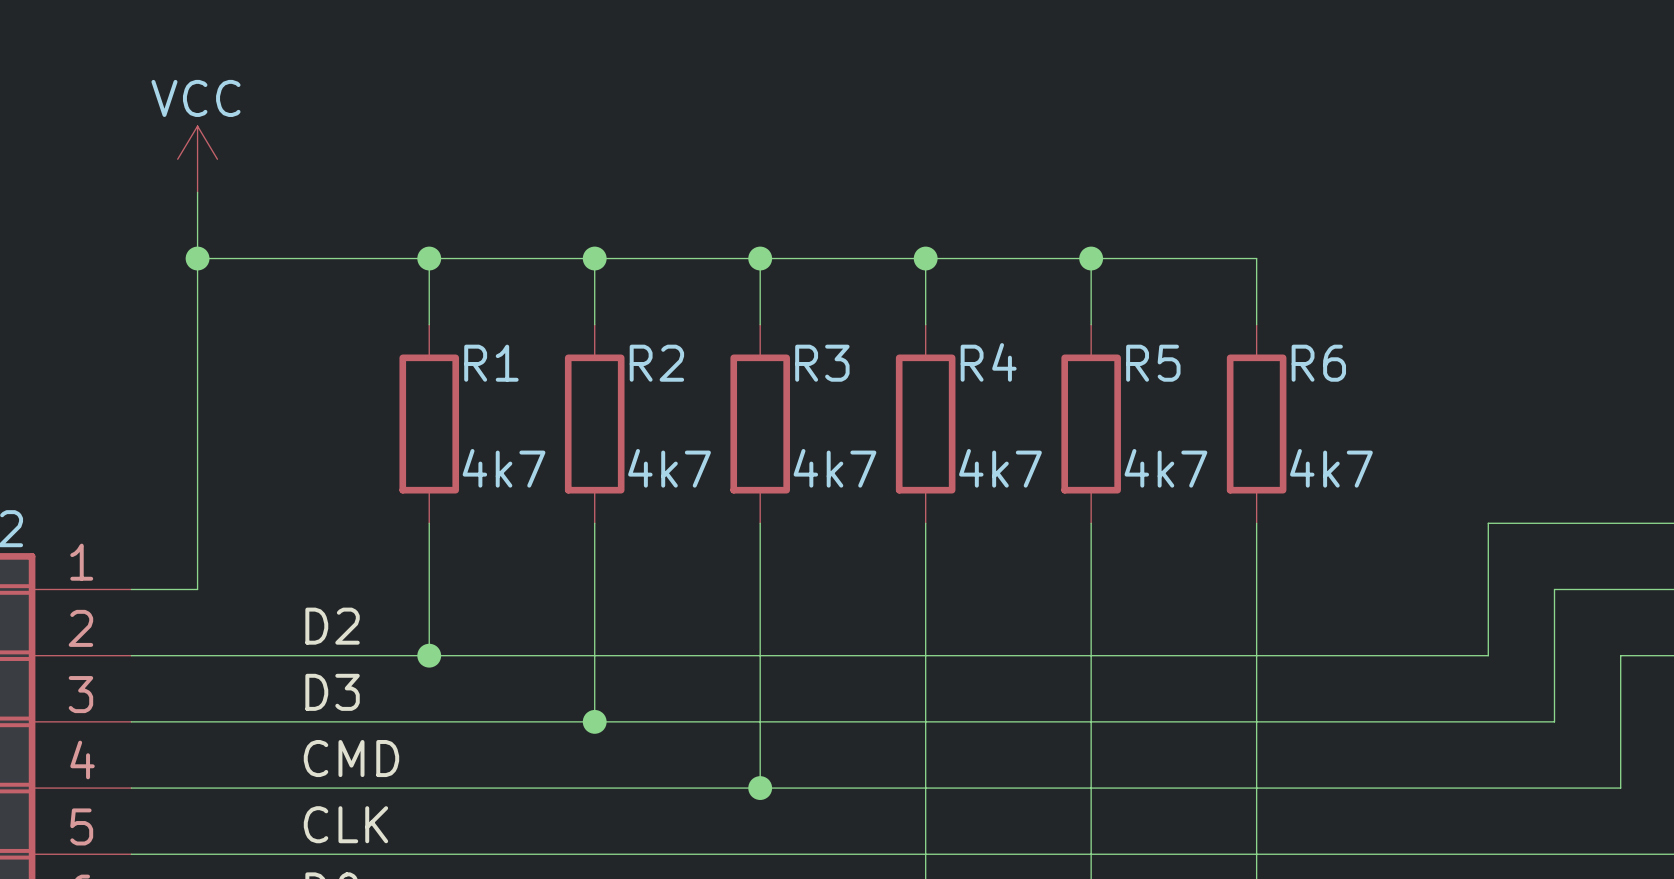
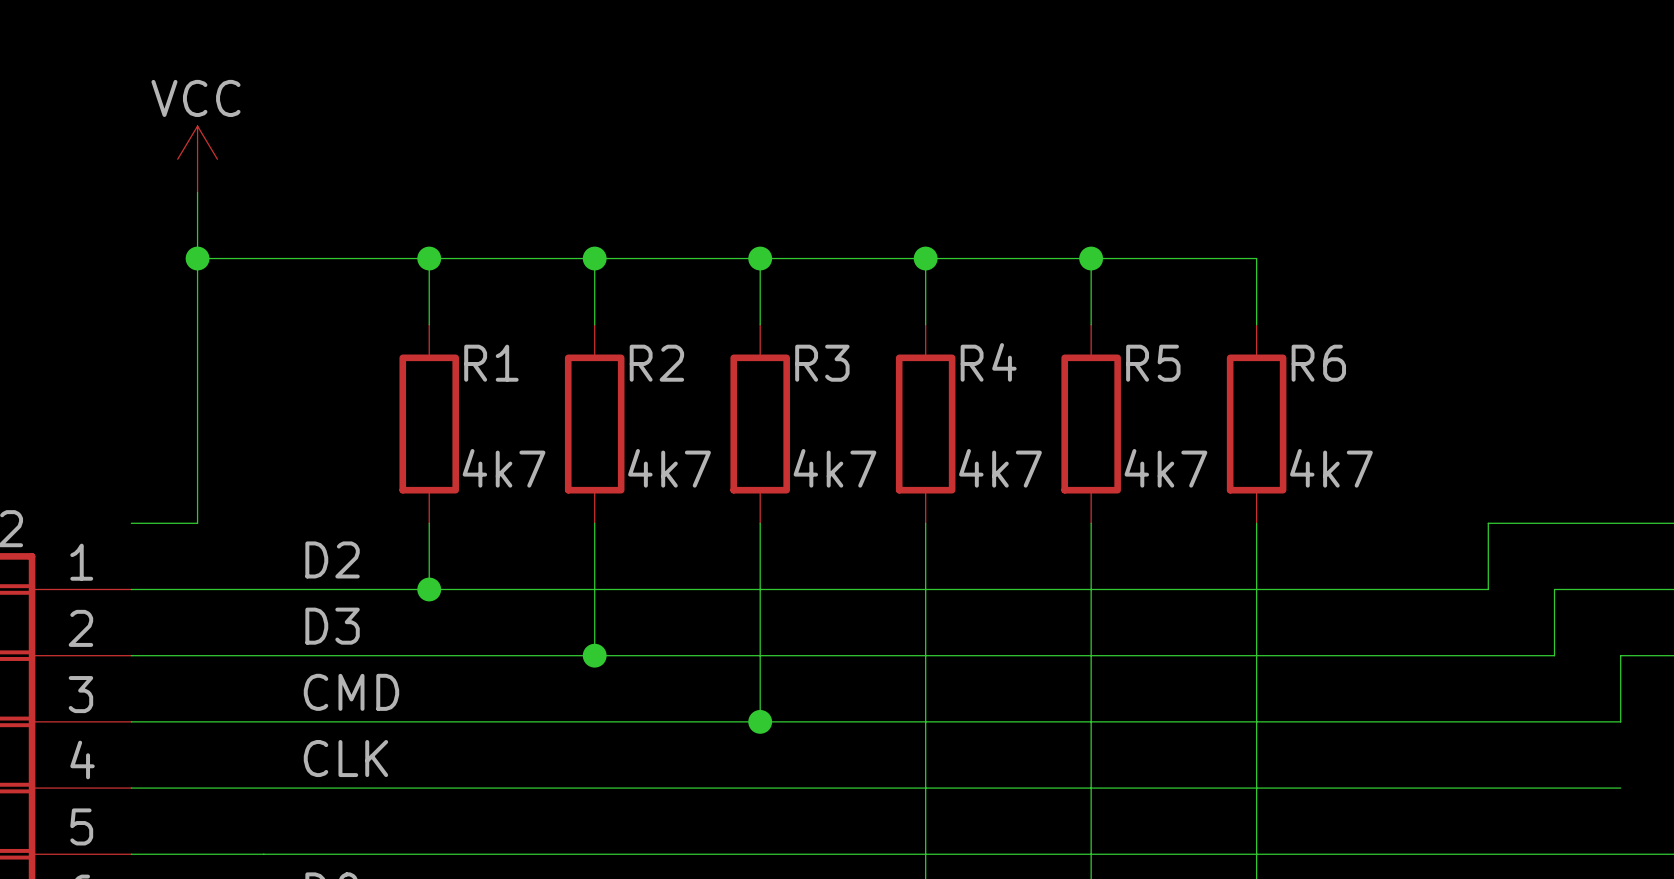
wire: (197, 523) (197, 589) -> (197, 523) (131, 523)
label: none -> D2 (332, 559)
wire: (429, 589) (429, 655) -> none
wire: (1488, 589) (1488, 655) -> (1488, 589) (197, 589)
label: D2 (332, 626) -> D3 (332, 626)
junction position: (429, 655) -> (429, 589)
wire: (594, 655) (594, 721) -> none
wire: (1554, 655) (1554, 721) -> (1554, 655) (1488, 655)
label: D3 (332, 692) -> CMD (351, 692)
junction position: (594, 721) -> (594, 655)
wire: (760, 721) (760, 788) -> none
wire: (1620, 721) (1620, 788) -> (1620, 721) (1554, 721)
label: CMD (351, 758) -> CLK (345, 758)
junction position: (760, 788) -> (760, 721)
label: CLK (345, 824) -> none

